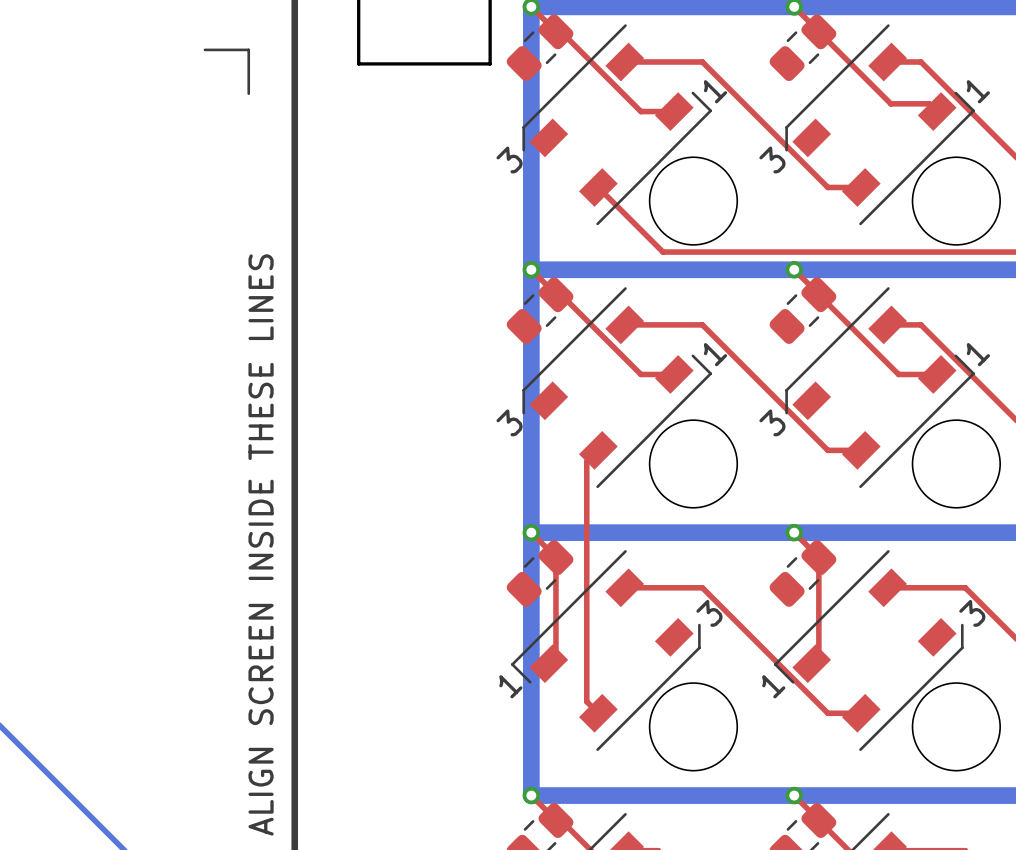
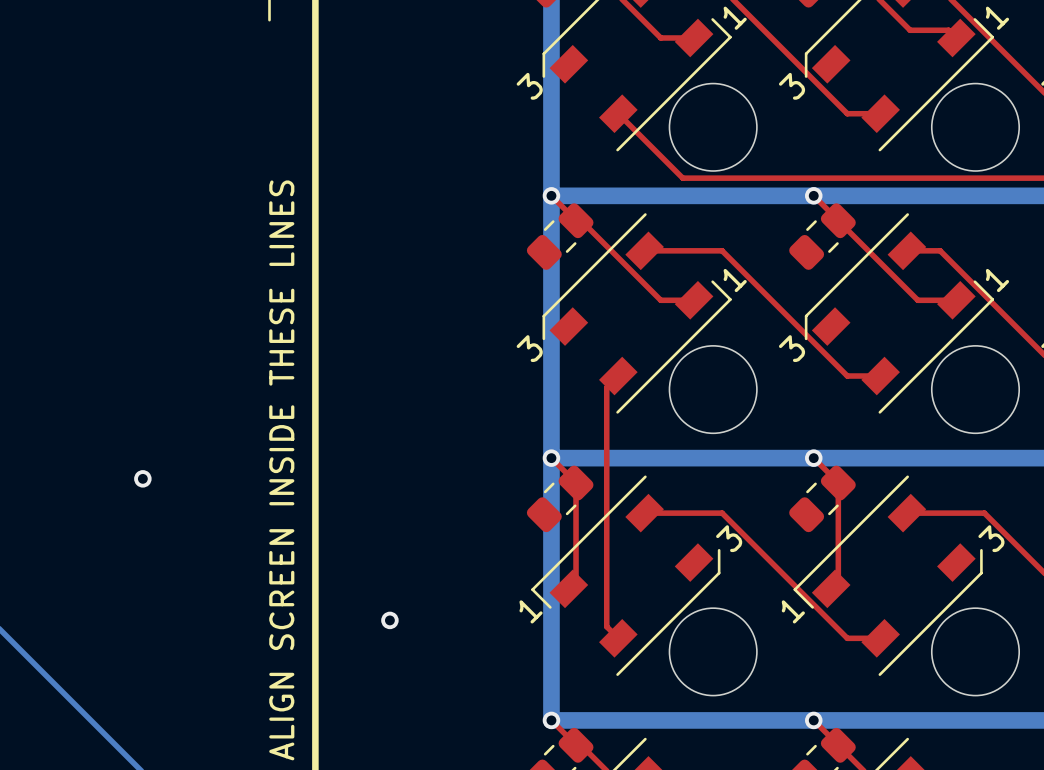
via: none -> (142, 478)
via: none -> (389, 620)

